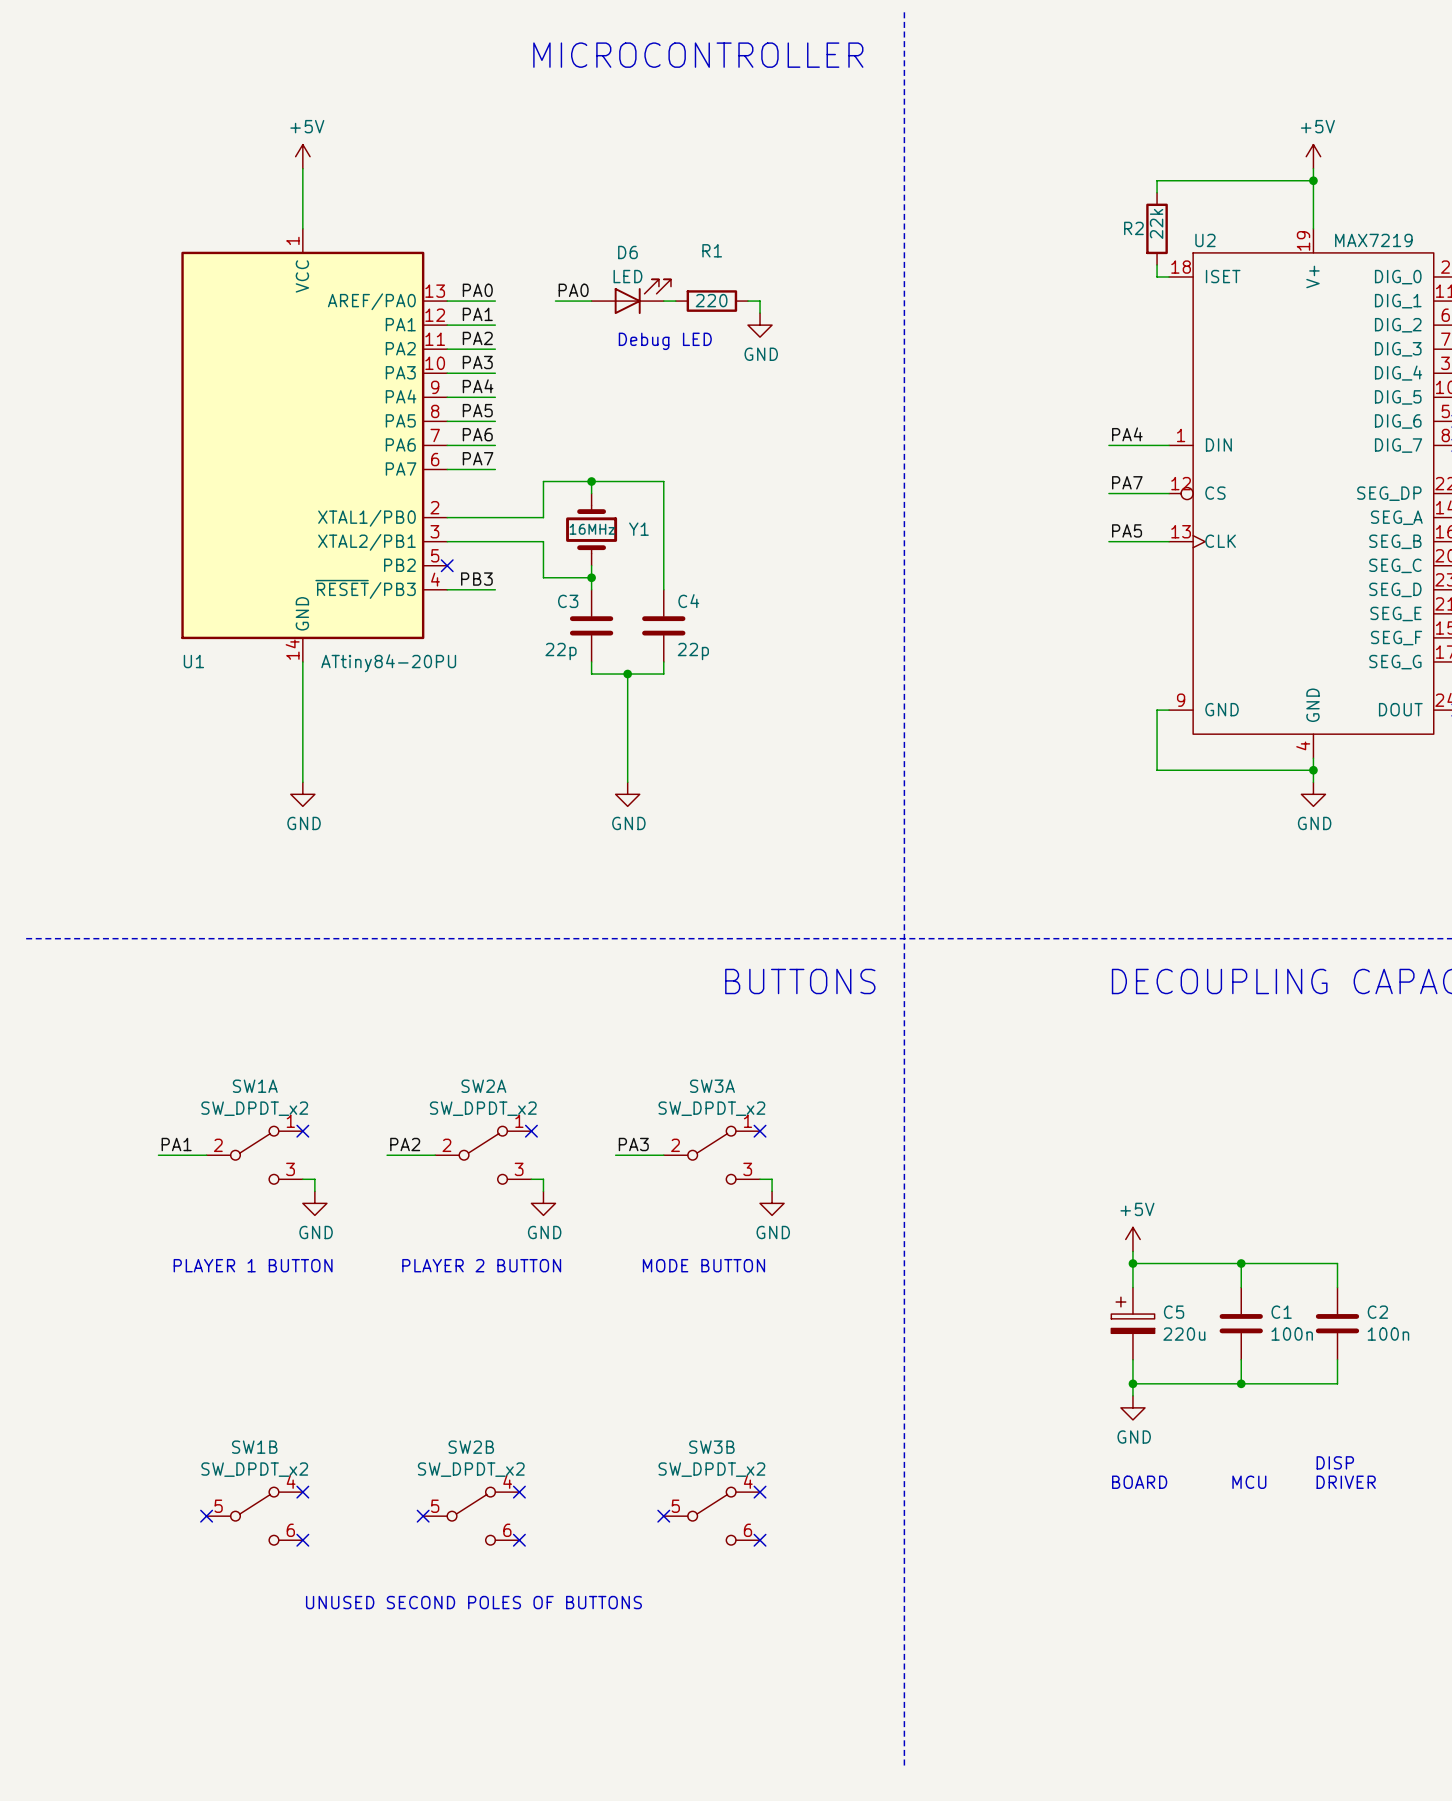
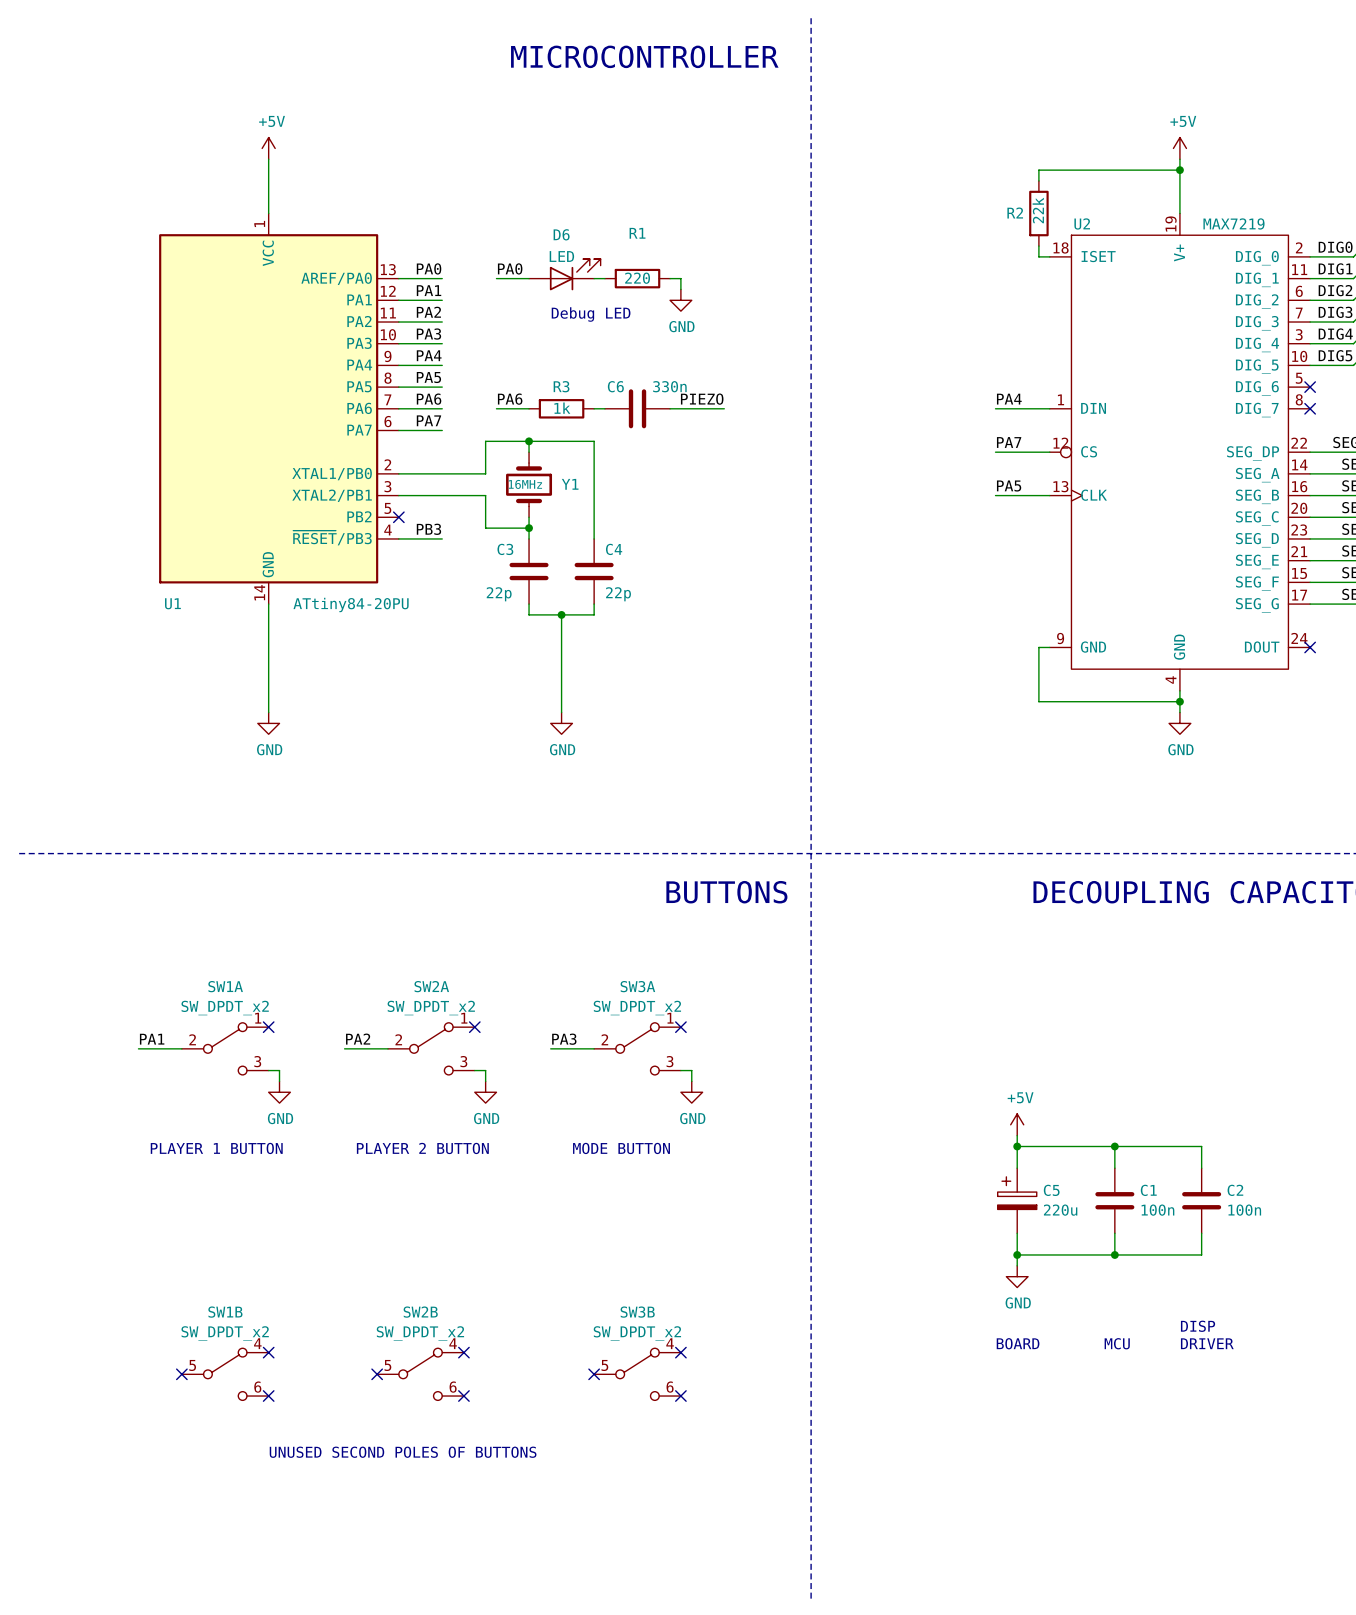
label: none -> PA6 (510, 399)
label: none -> PIEZO (702, 399)
wire: none -> (496, 408) (529, 408)
R3: none -> 1k (561, 408)
wire: none -> (594, 408) (604, 408)
C6: none -> 330n (637, 408)
wire: none -> (670, 408) (724, 408)

